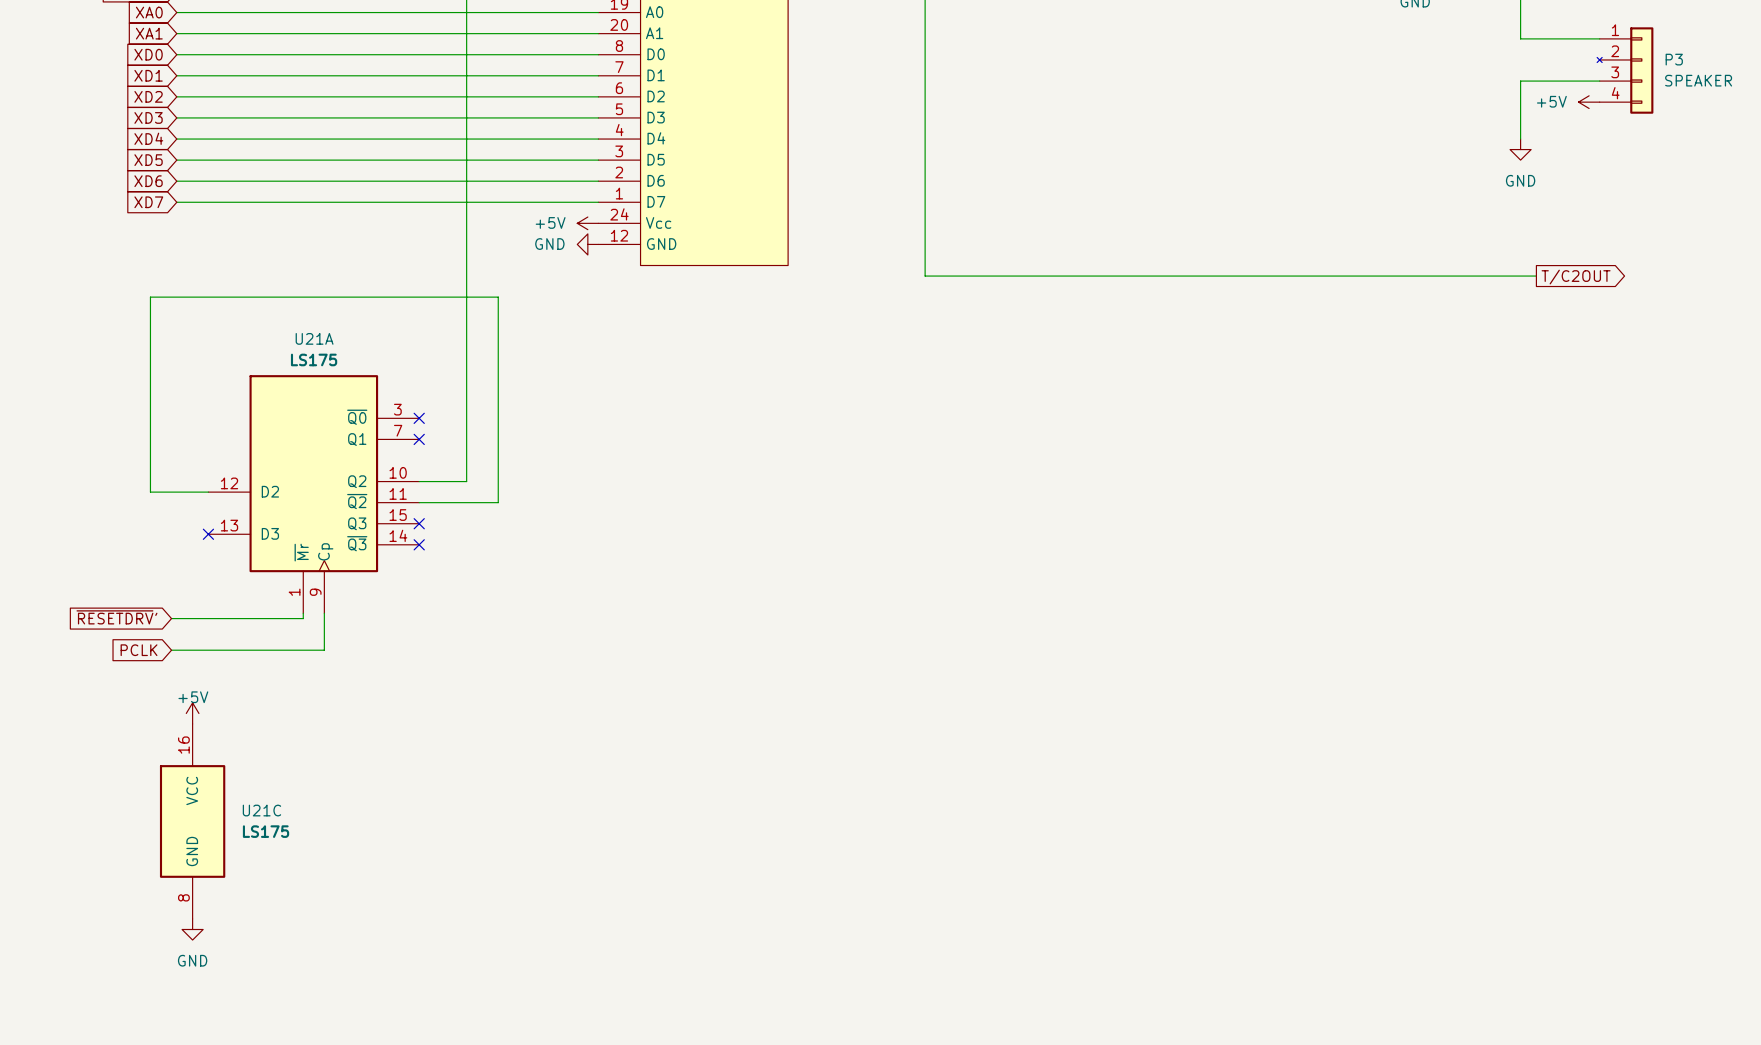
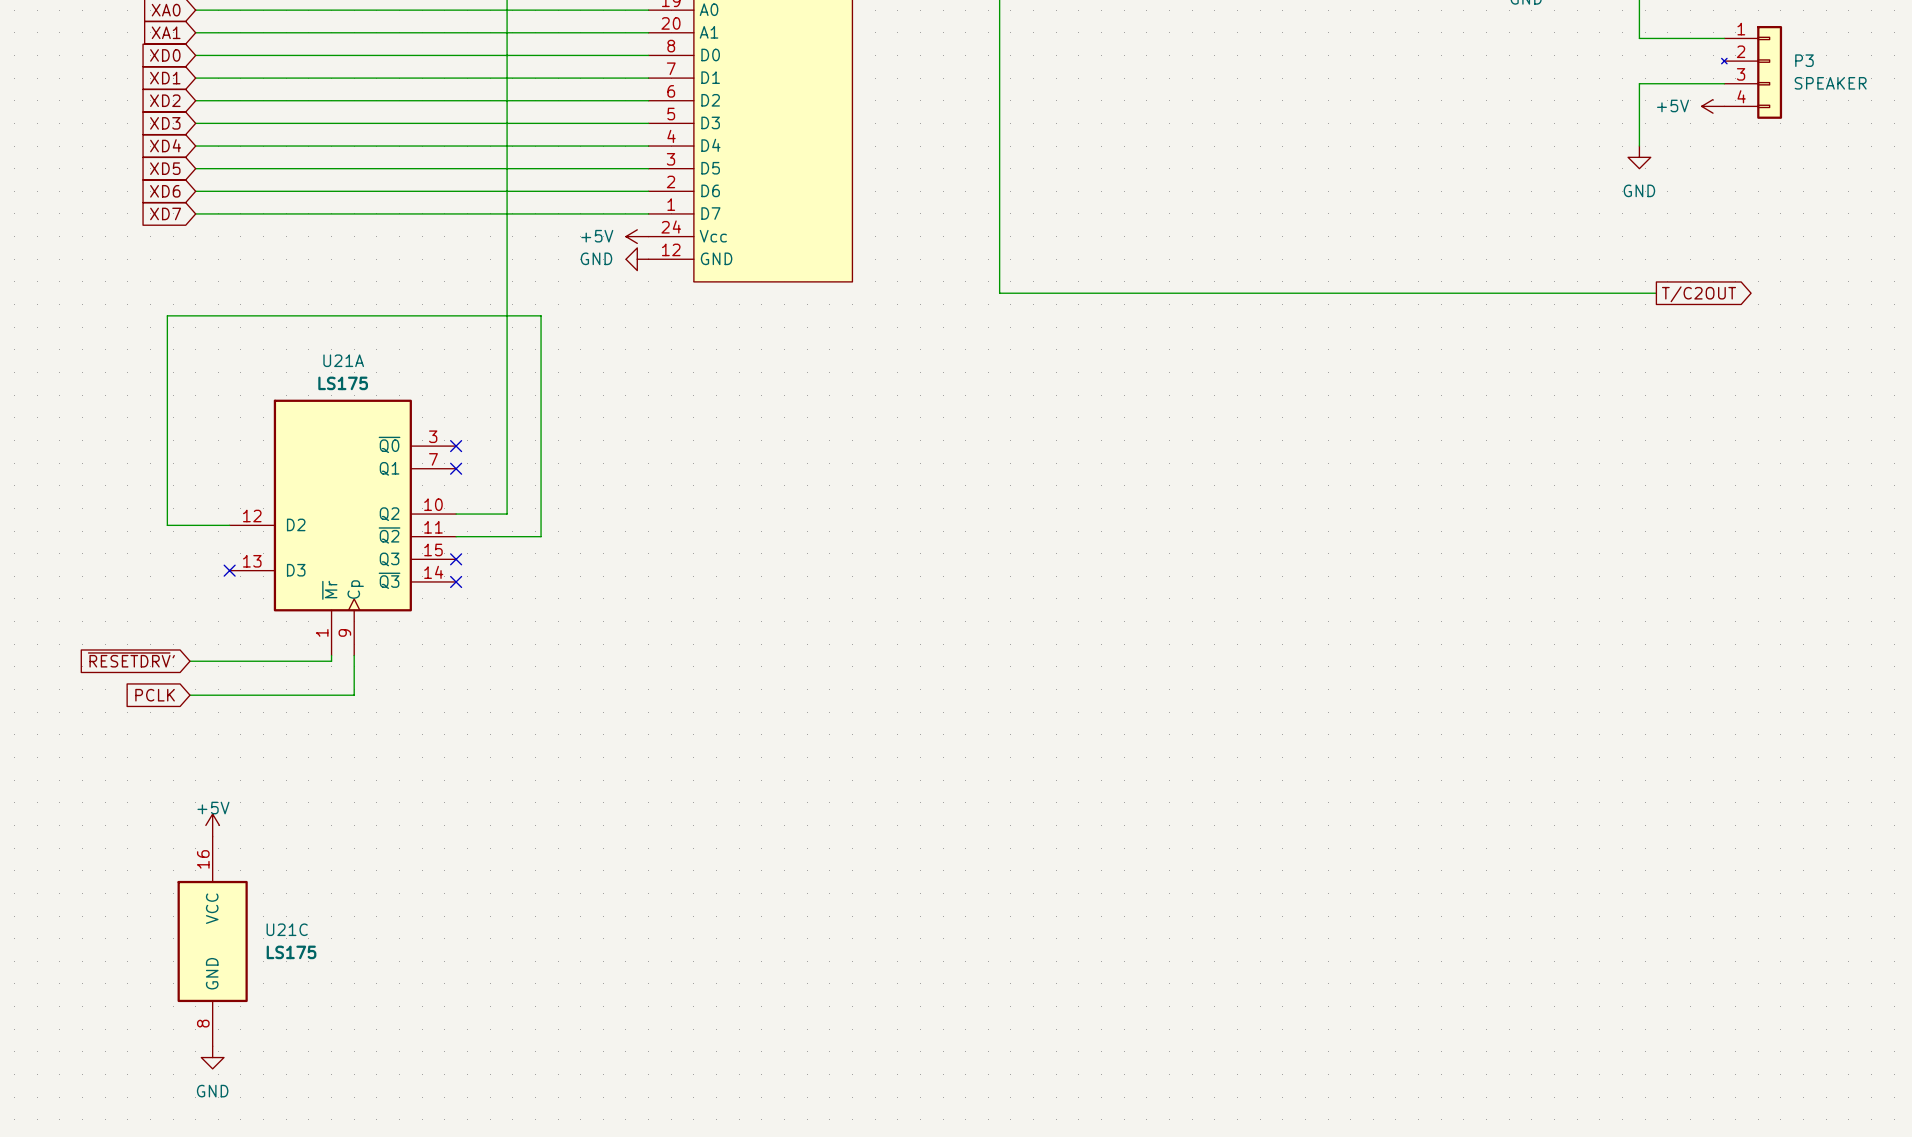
power symbol position: +5V (192, 713) -> +5V (212, 825)
U21C position: (192, 821) -> (212, 941)
power symbol position: GND (192, 929) -> GND (212, 1057)

